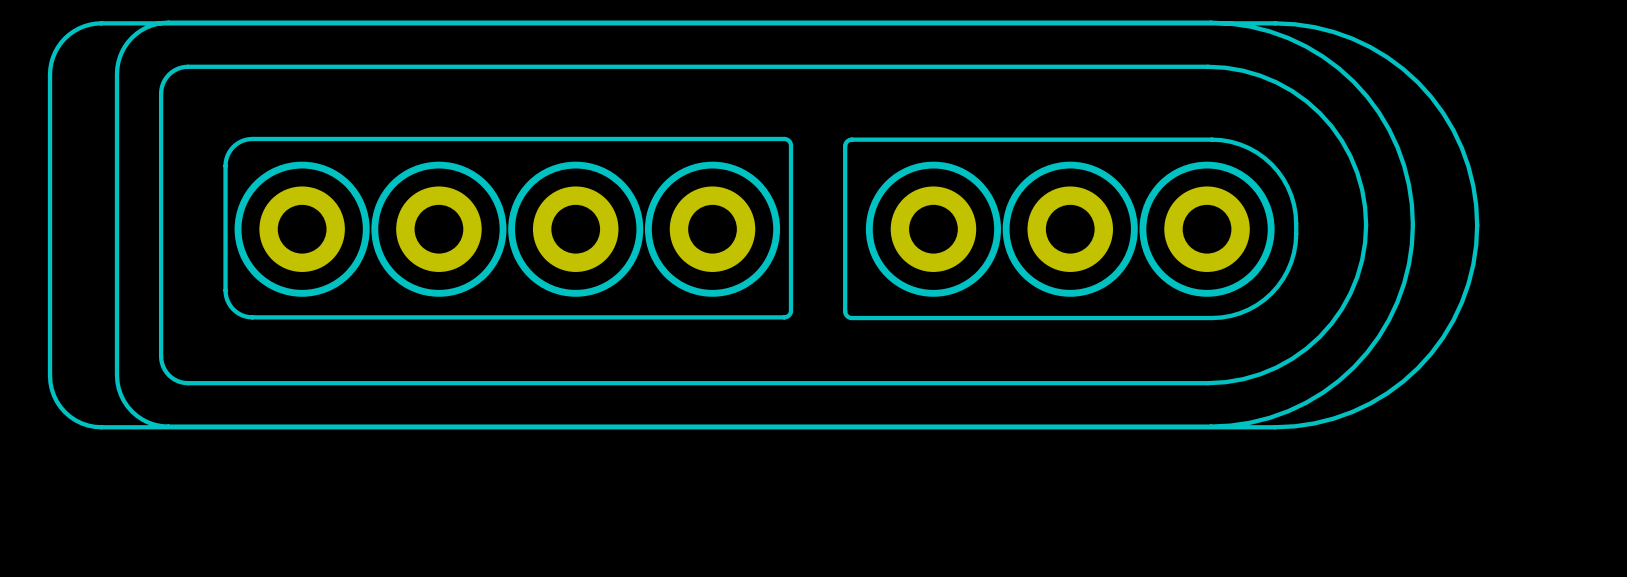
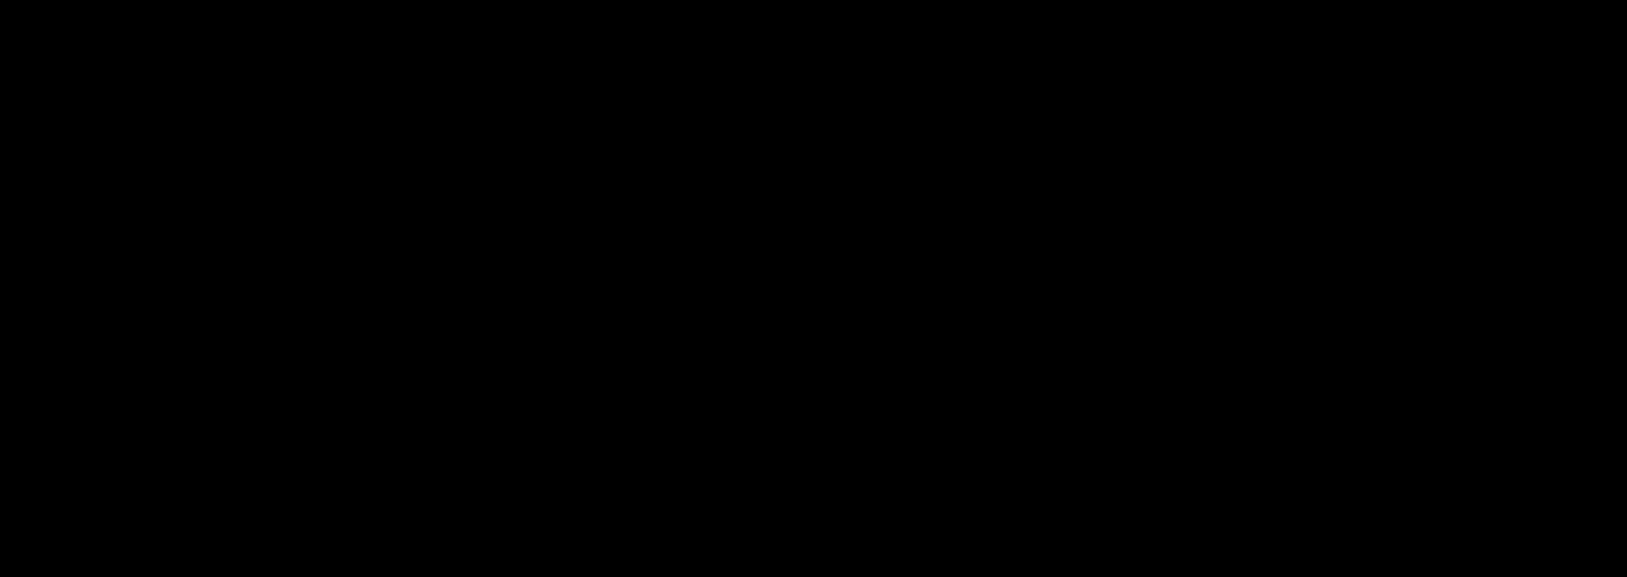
part: (763, 224) -> none

